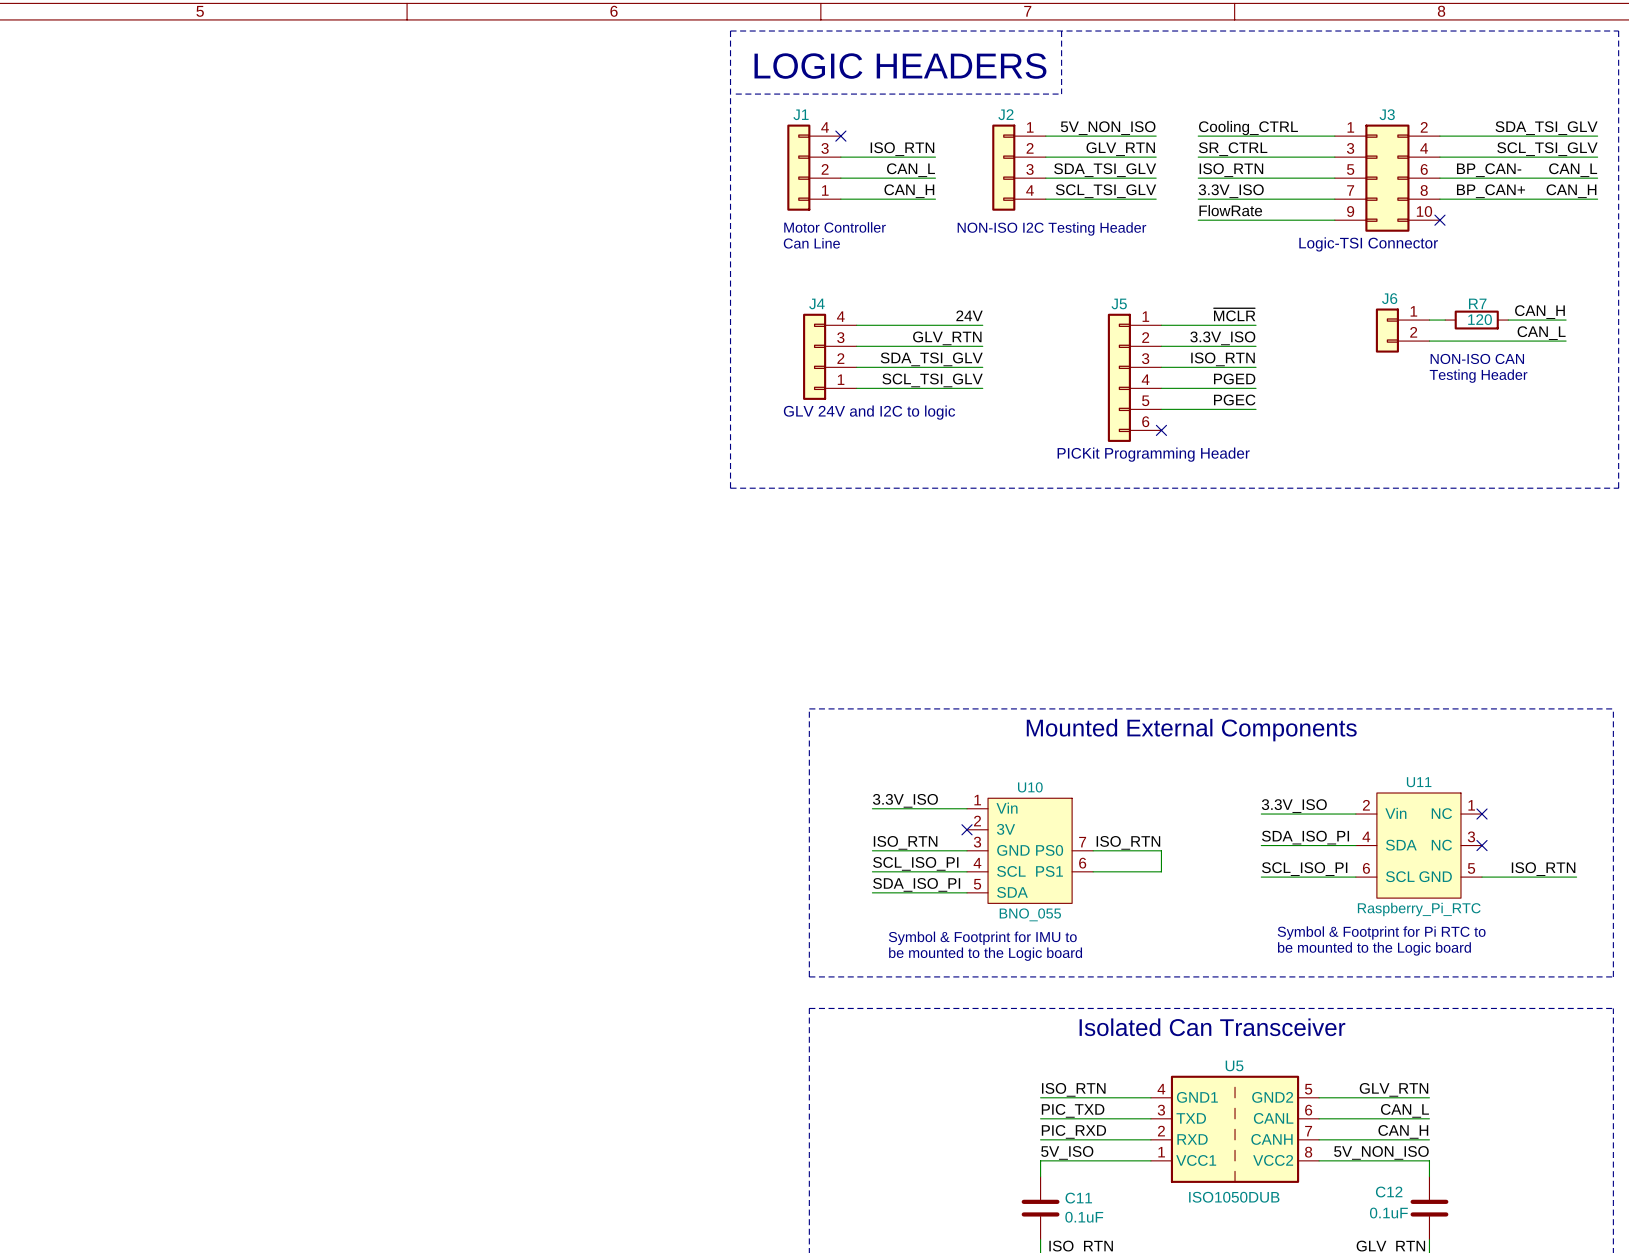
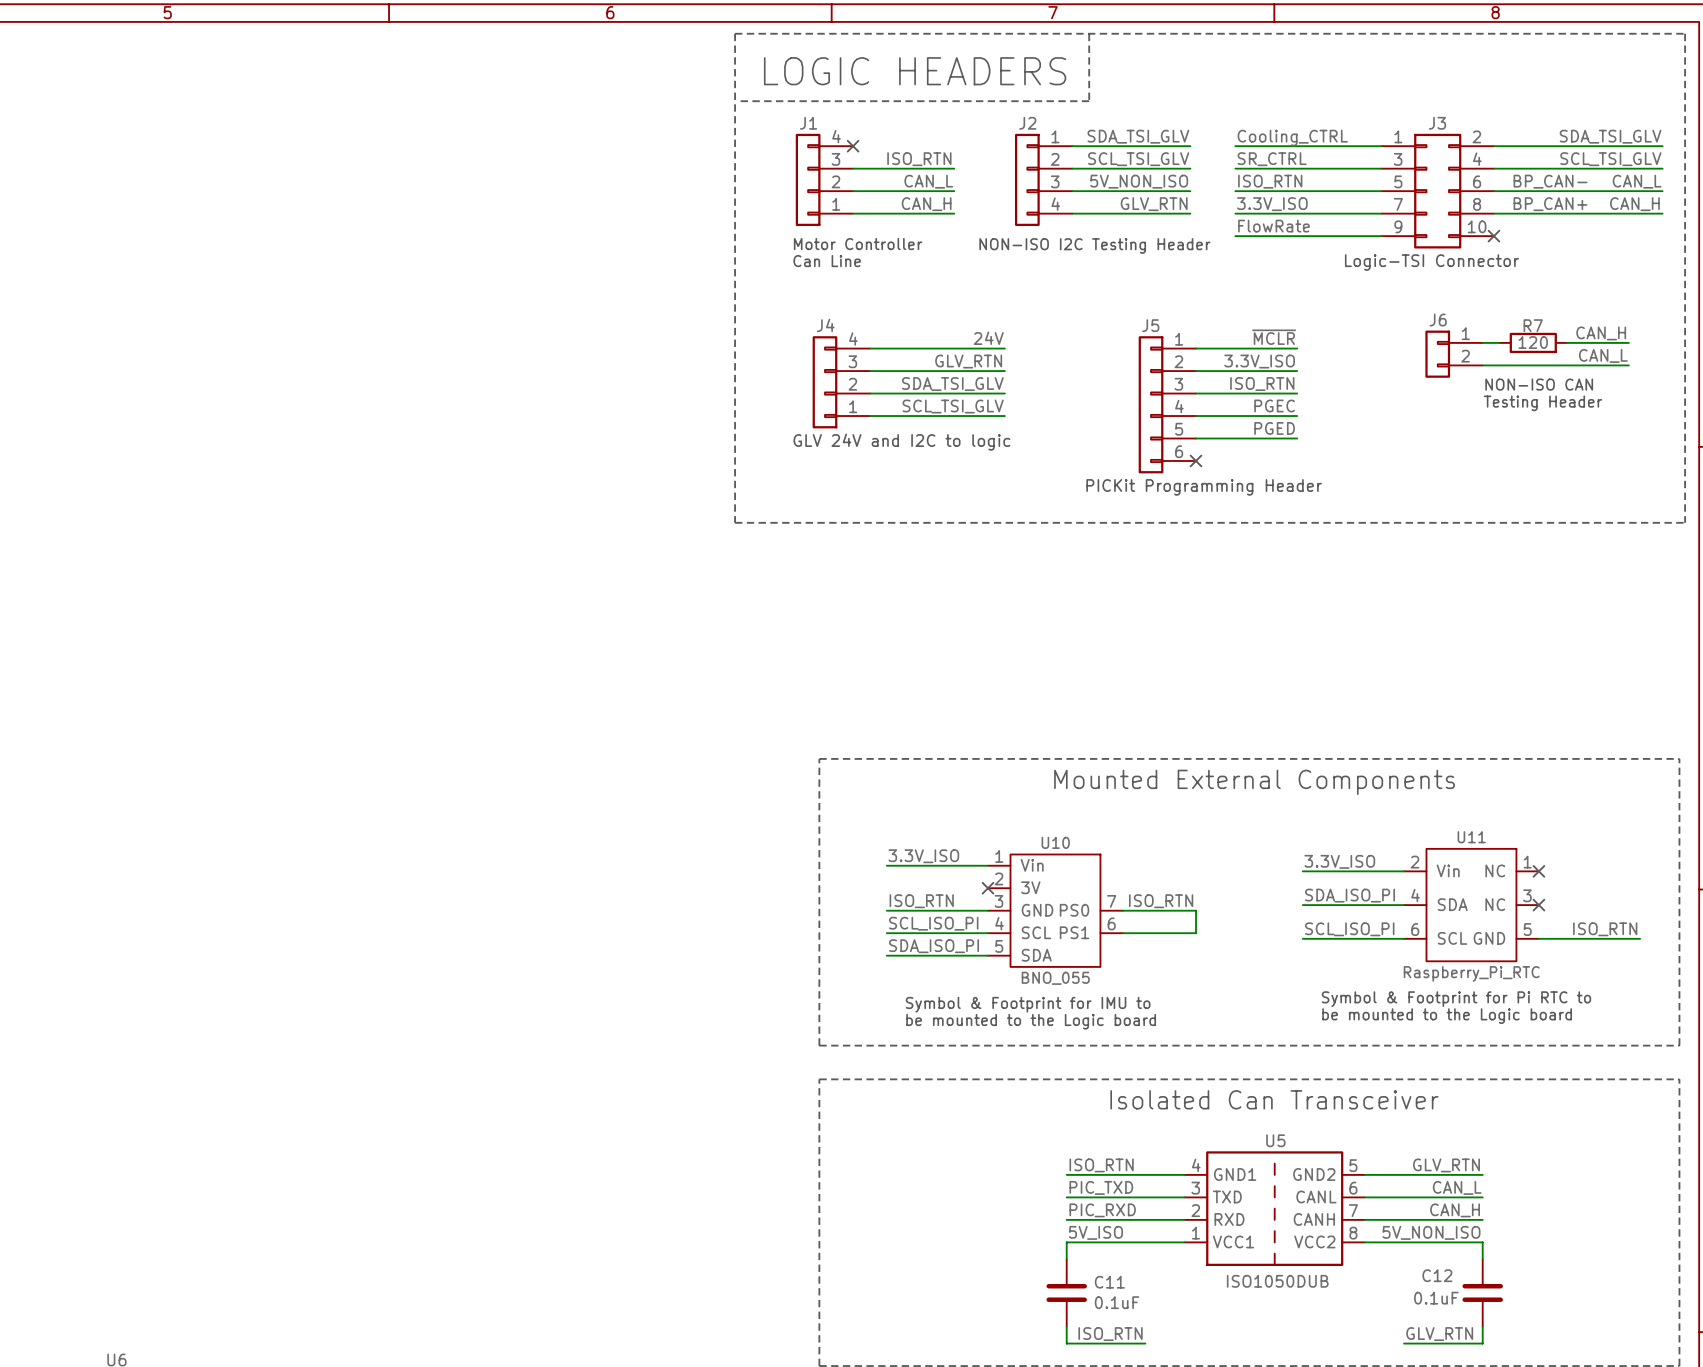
label: 5V_NON_ISO (1108, 128) -> SDA_TSI_GLV (1138, 136)
label: GLV_RTN (1120, 149) -> SCL_TSI_GLV (1138, 159)
label: SDA_TSI_GLV (1105, 170) -> 5V_NON_ISO (1139, 181)
label: SCL_TSI_GLV (1105, 191) -> GLV_RTN (1154, 204)
label: PGED (1234, 378) -> PGEC (1274, 405)
label: PGEC (1234, 399) -> PGED (1274, 428)

